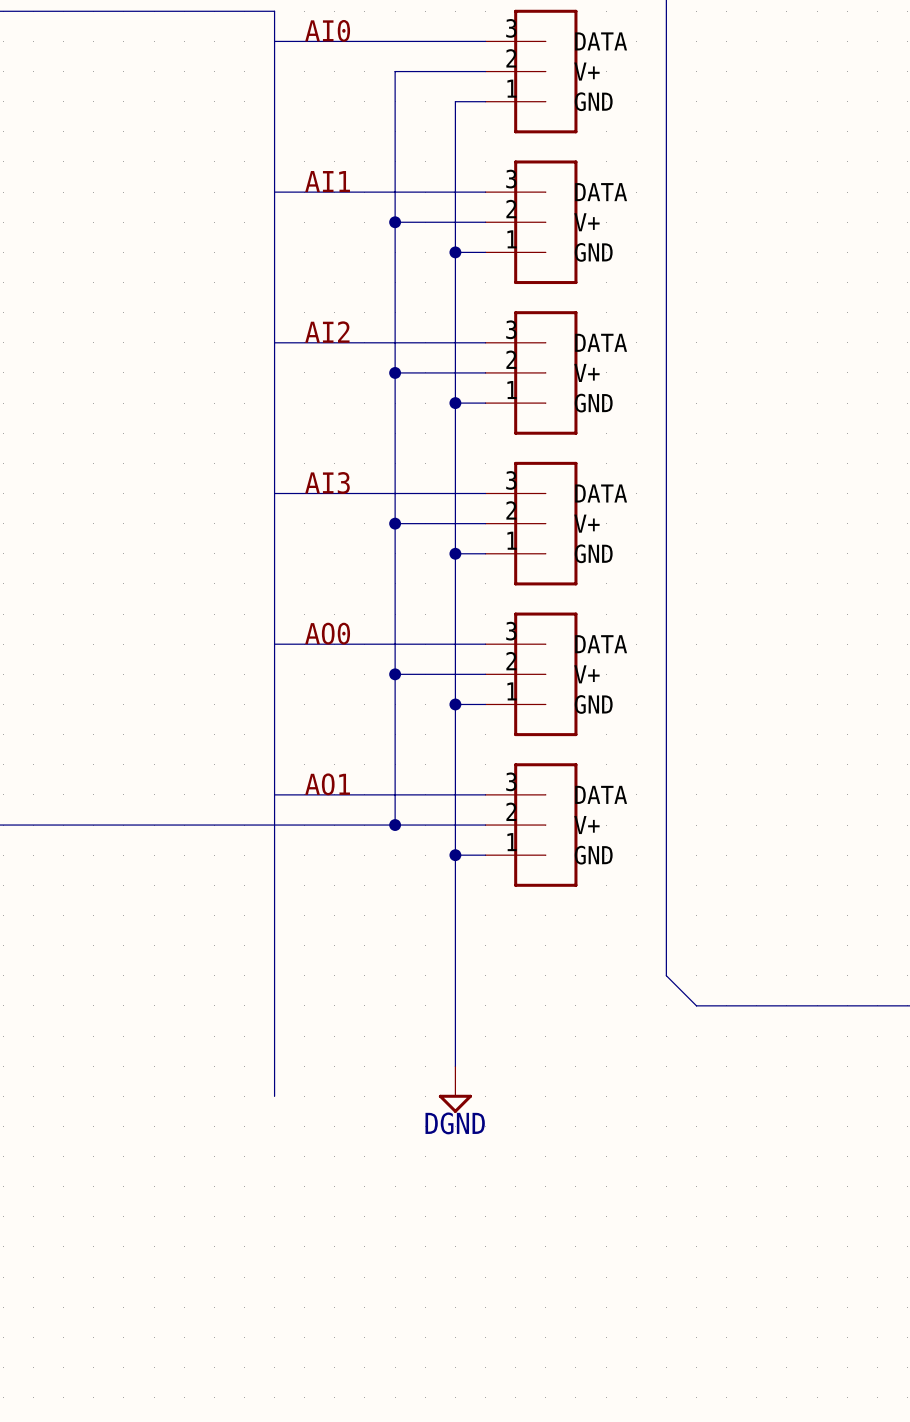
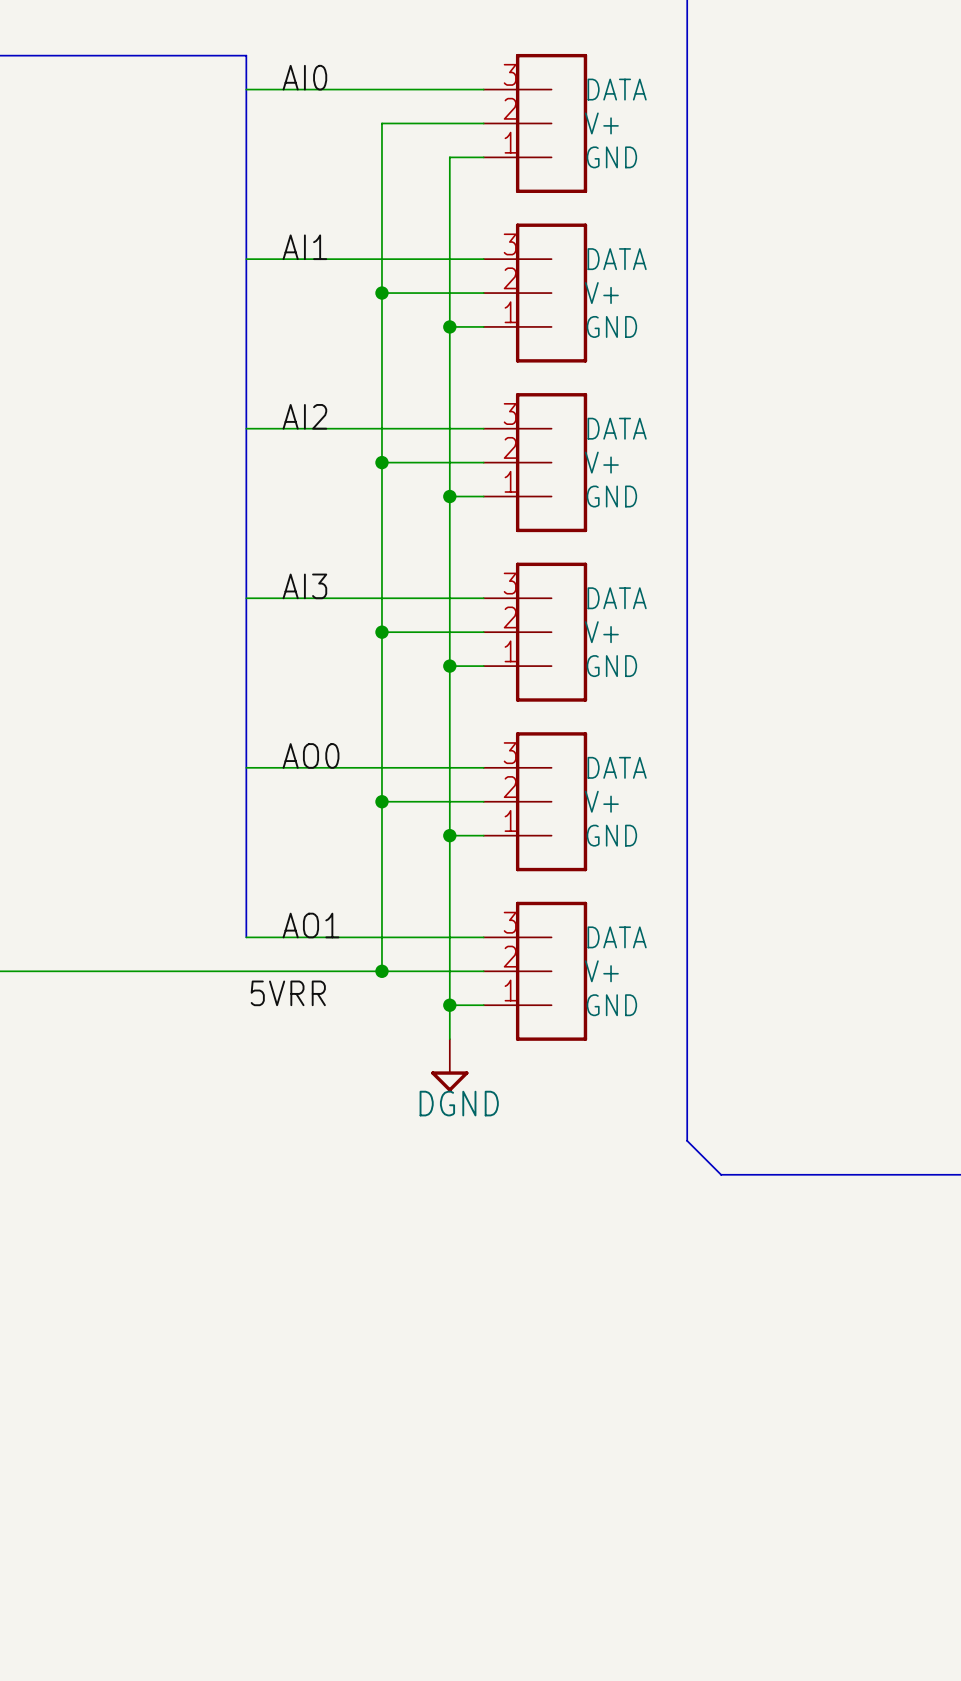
bus: (274, 794) (274, 1096) -> none
label: none -> 5VRR (288, 993)
wire: (455, 885) (455, 1066) -> none
power symbol position: DGND (455, 1089) -> DGND (449, 1065)

